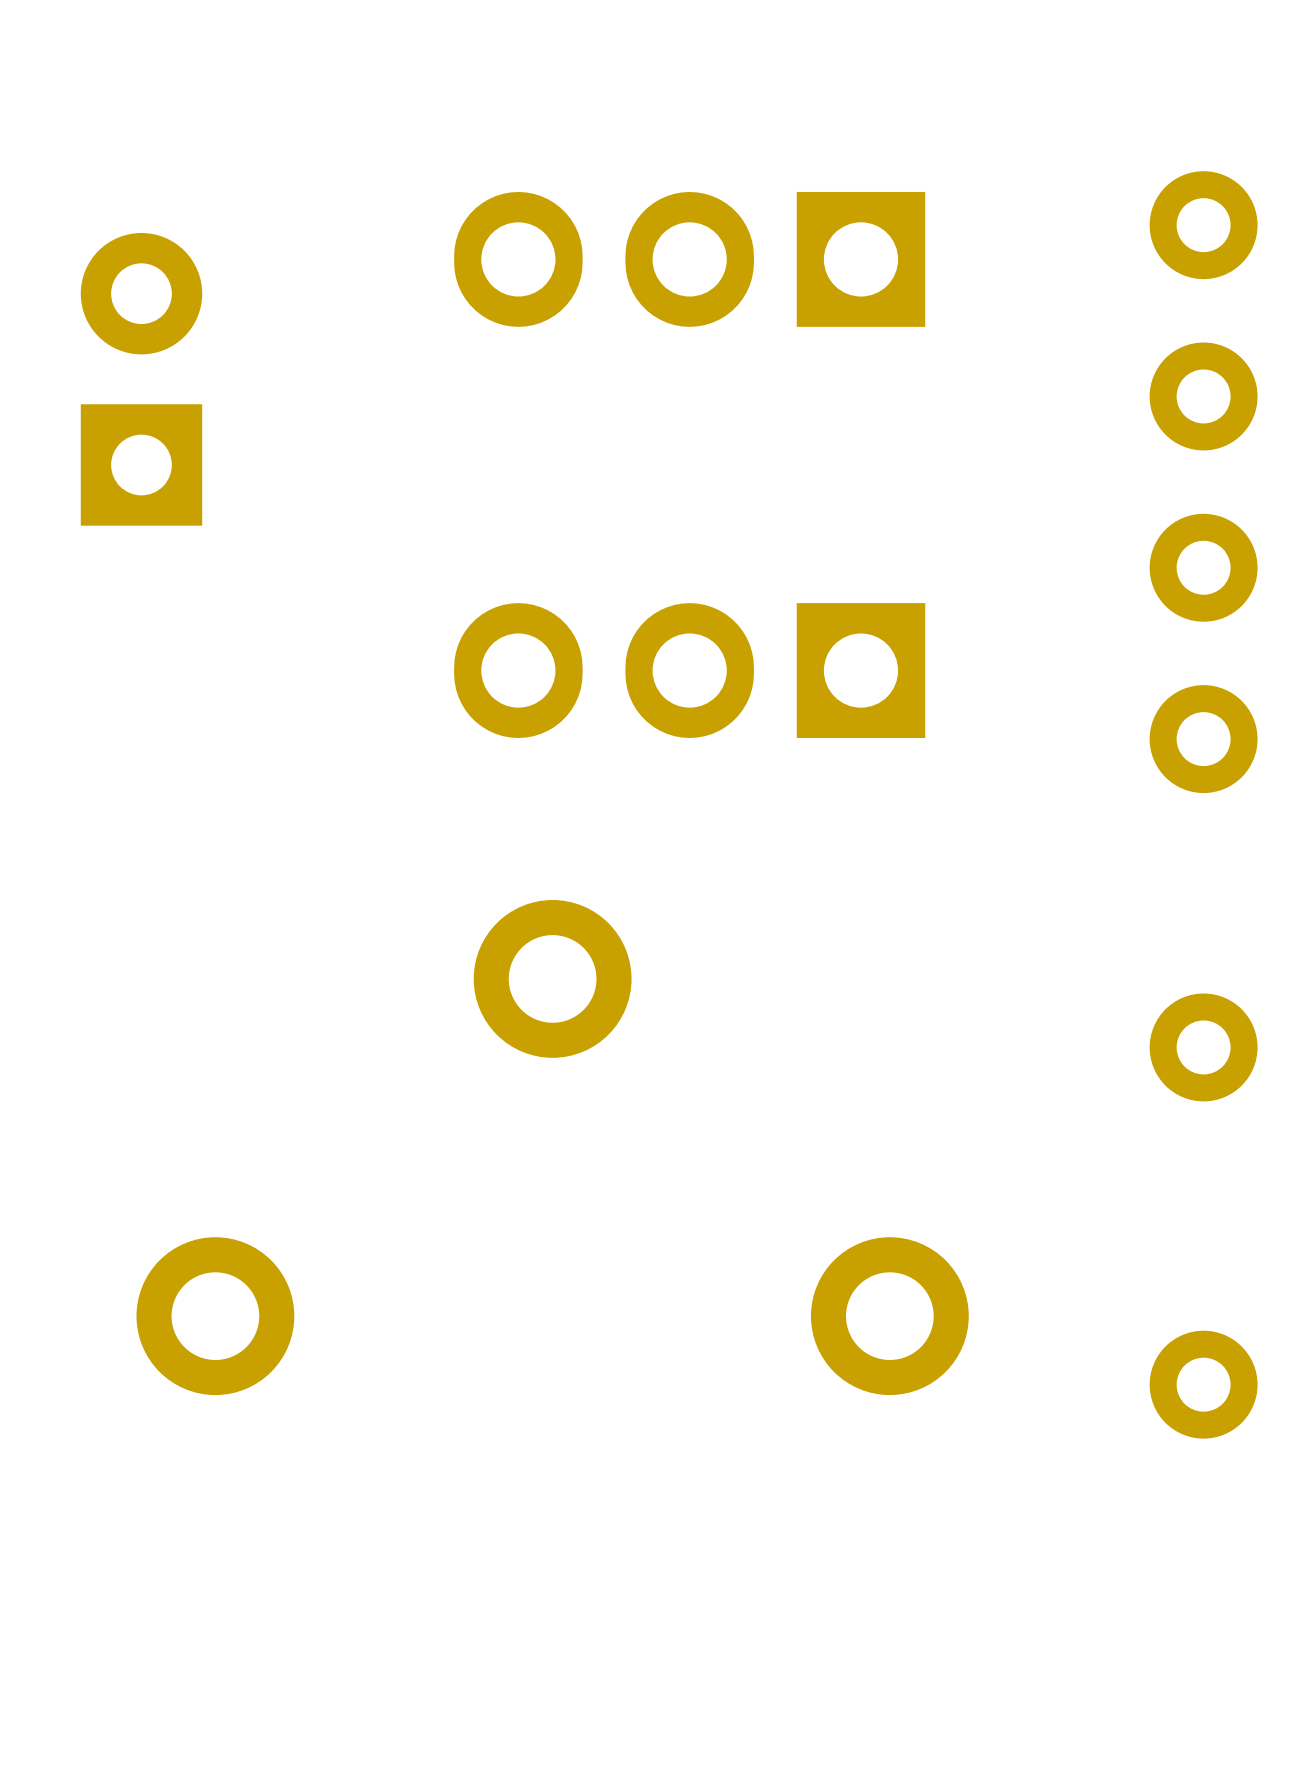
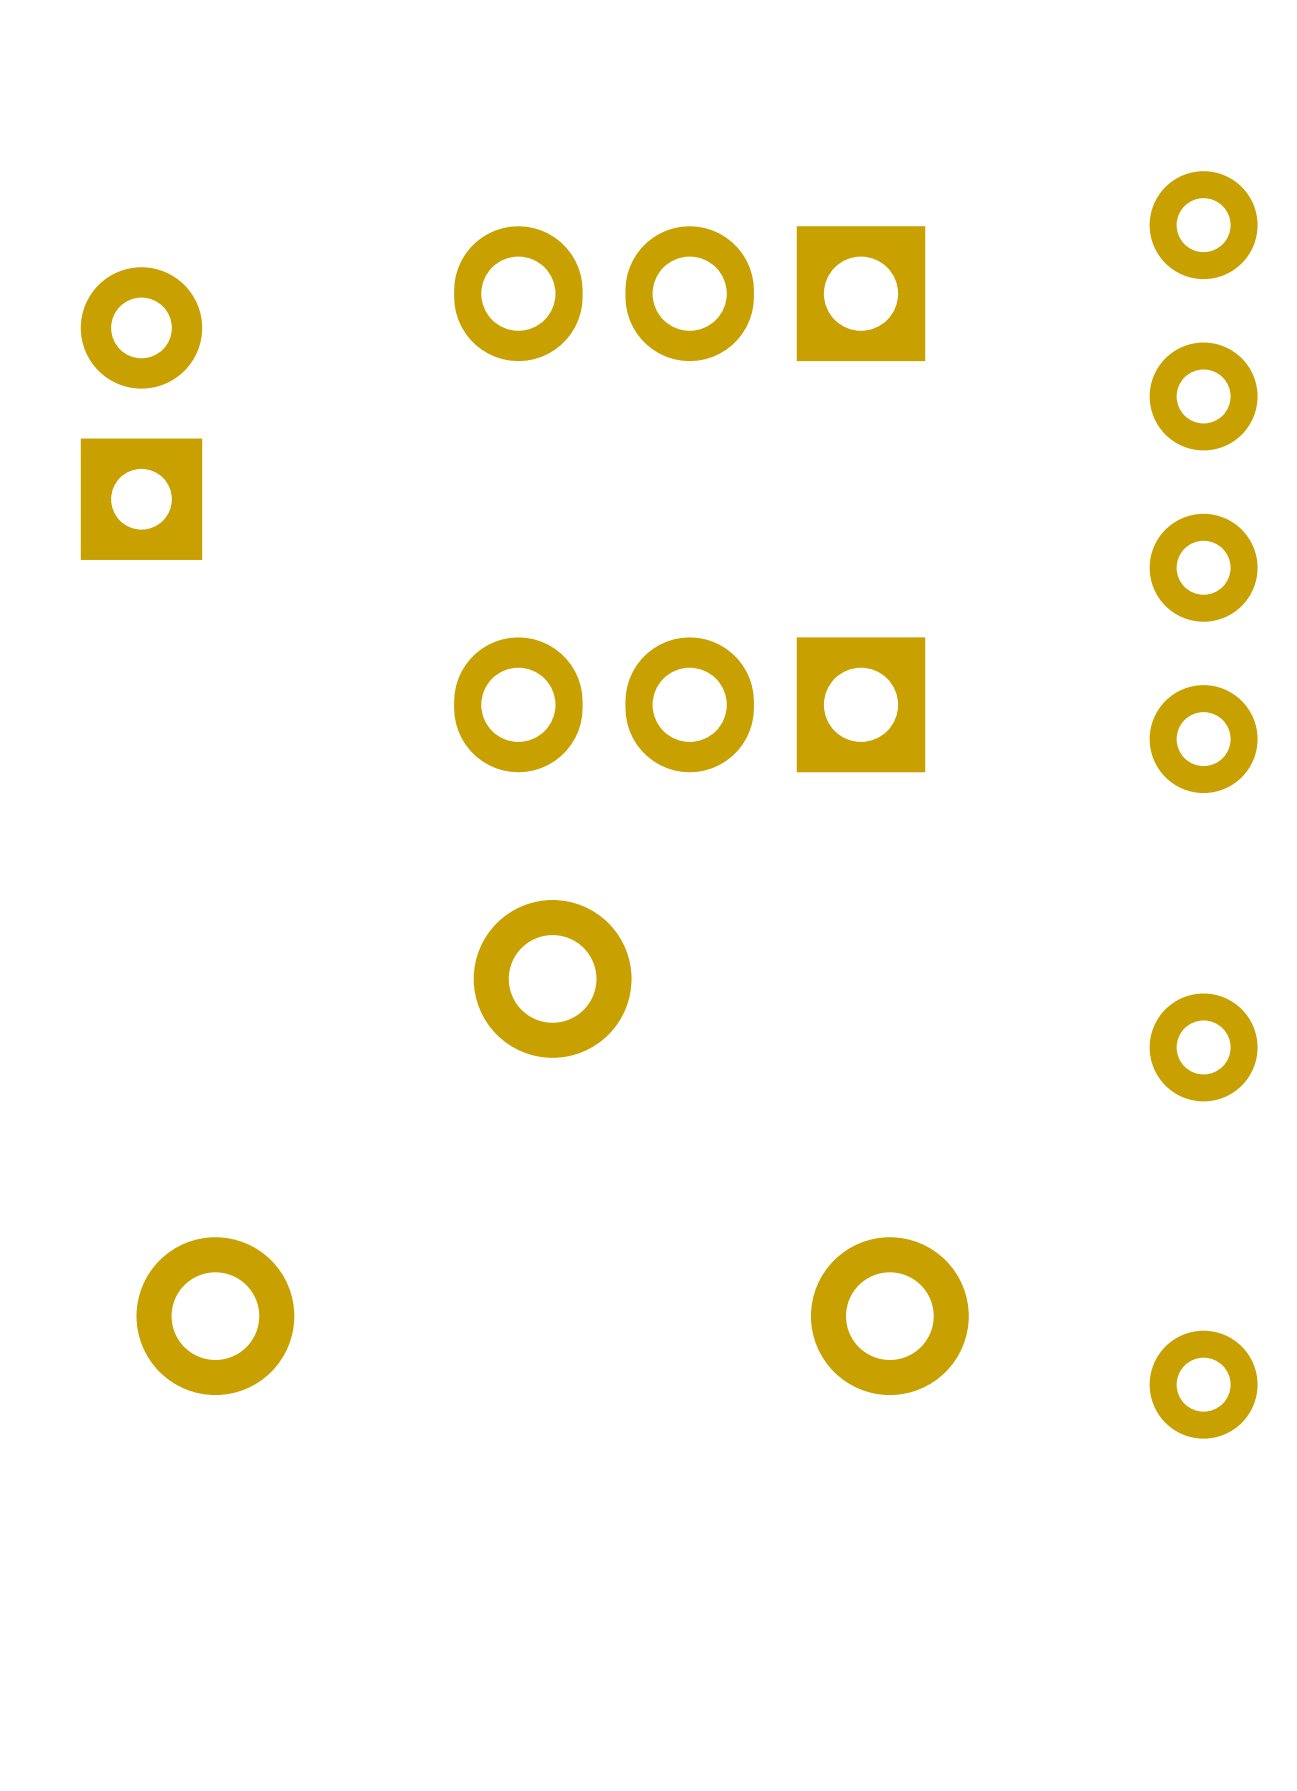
part position: (689, 259) -> (689, 293)
part position: (141, 379) -> (141, 413)
part position: (689, 670) -> (689, 704)

